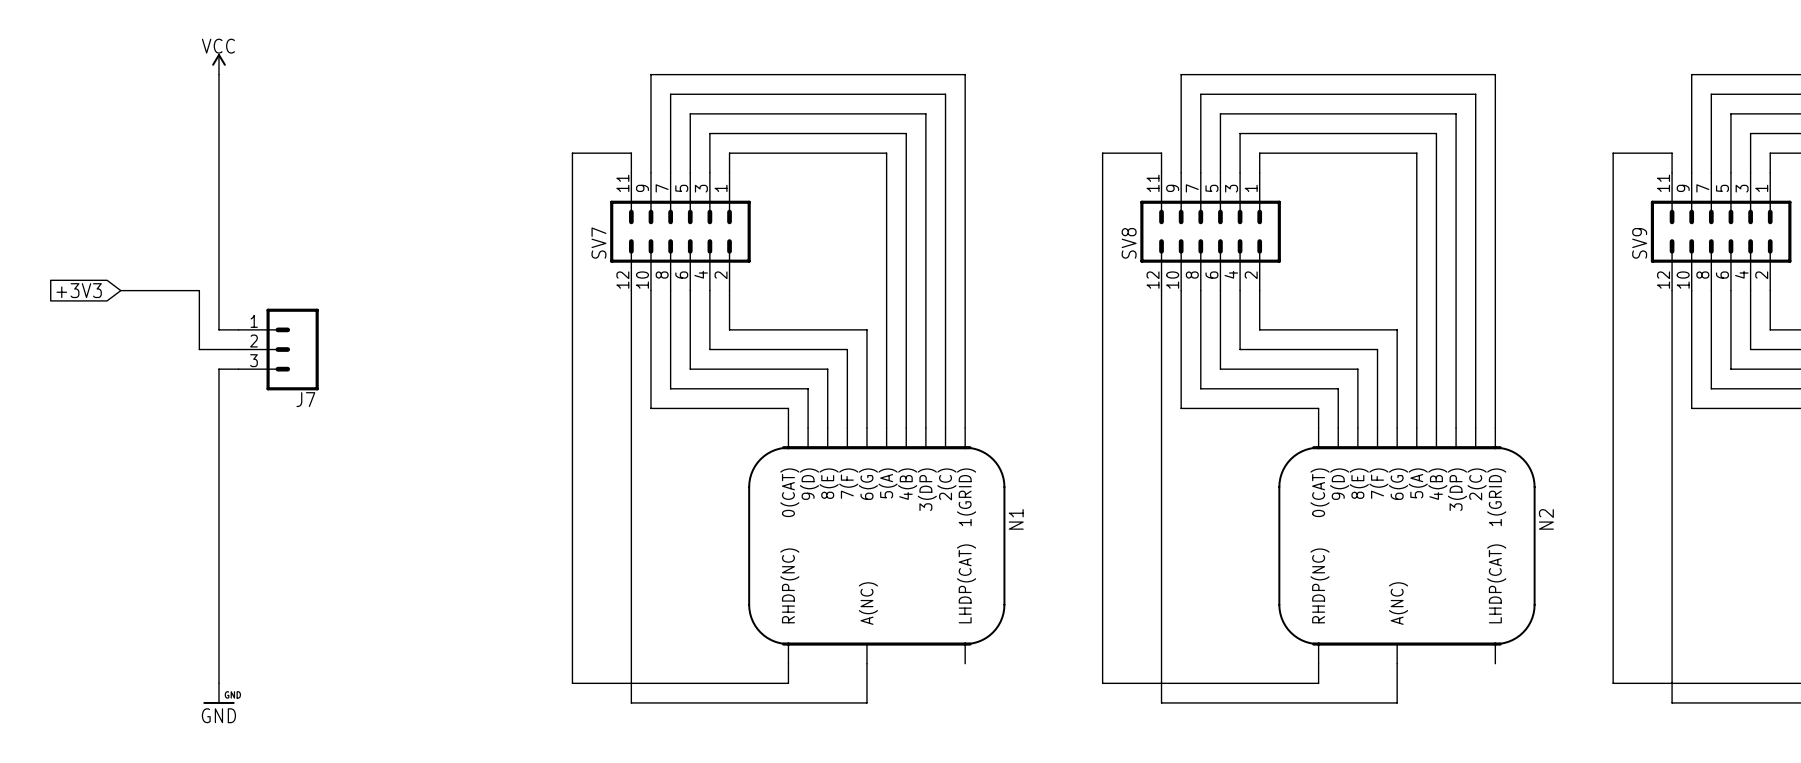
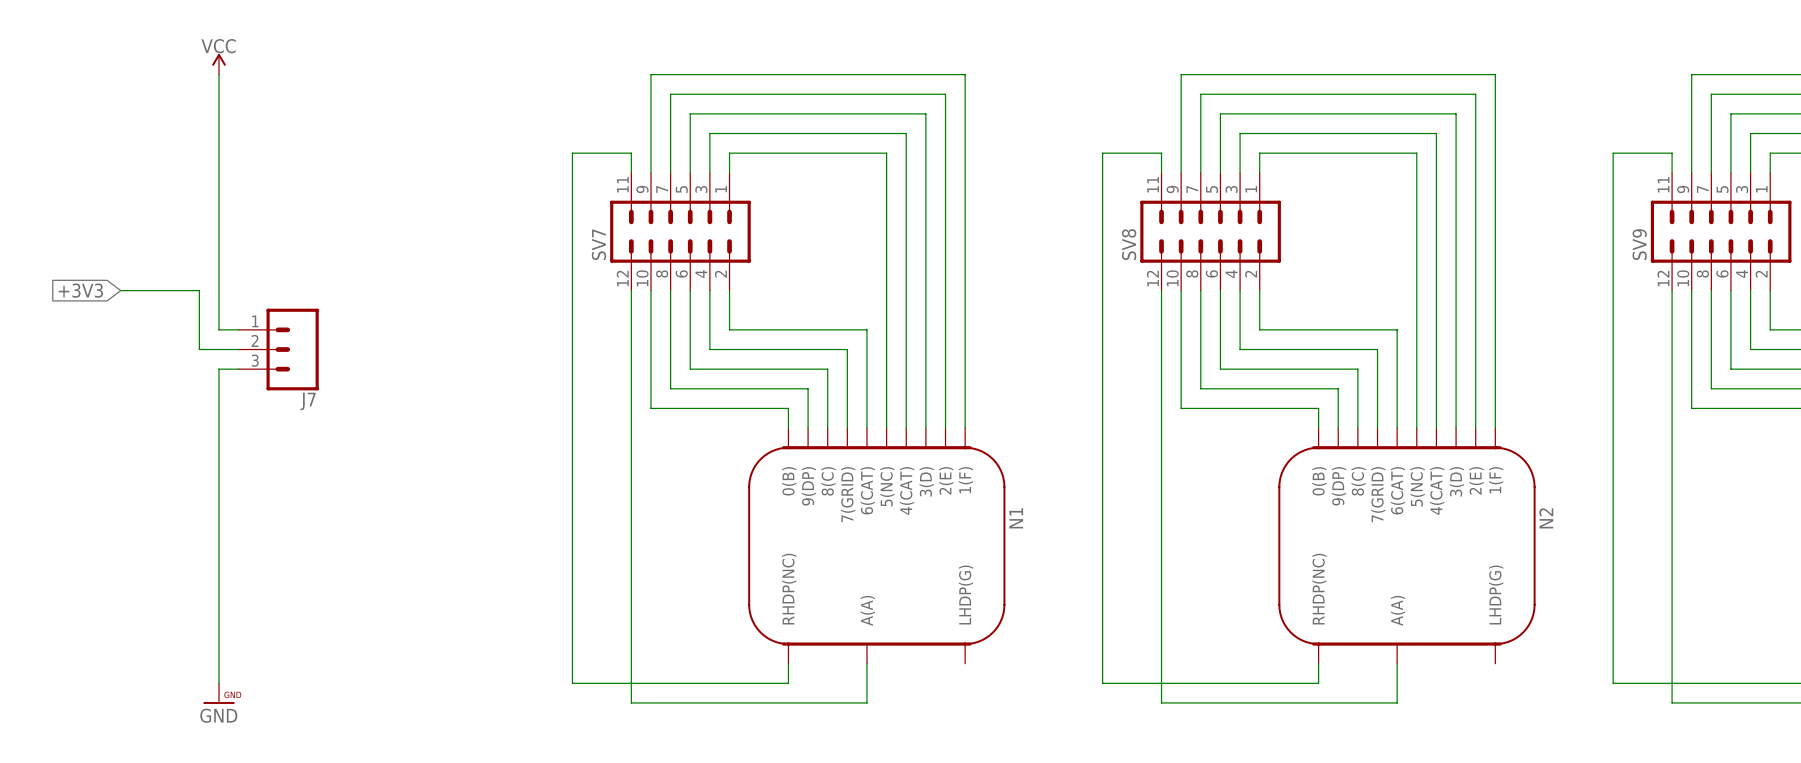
N1 symbol: [748, 428, 1006, 664] -> [748, 428, 1006, 664]
N2 symbol: [1278, 428, 1536, 664] -> [1278, 428, 1536, 664]

